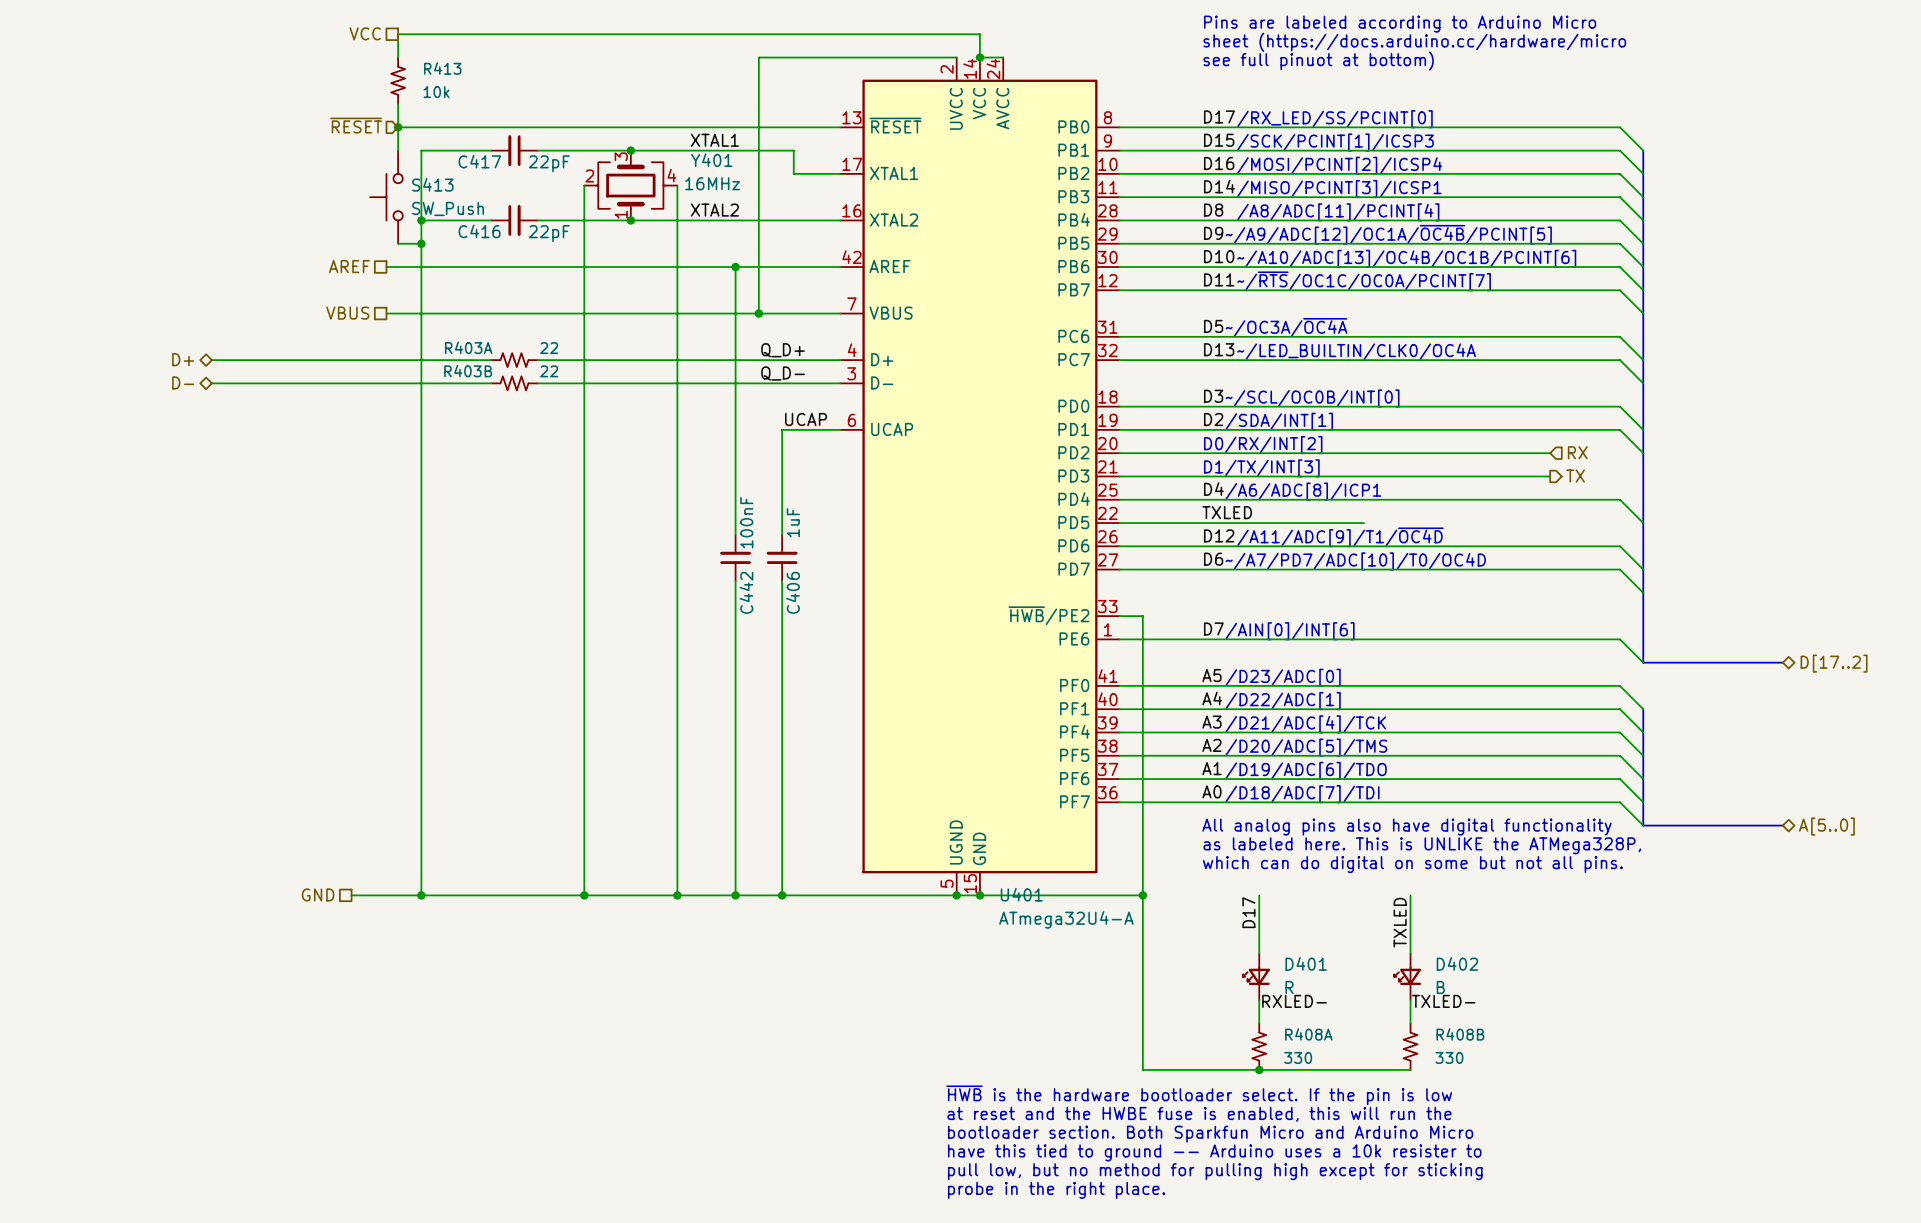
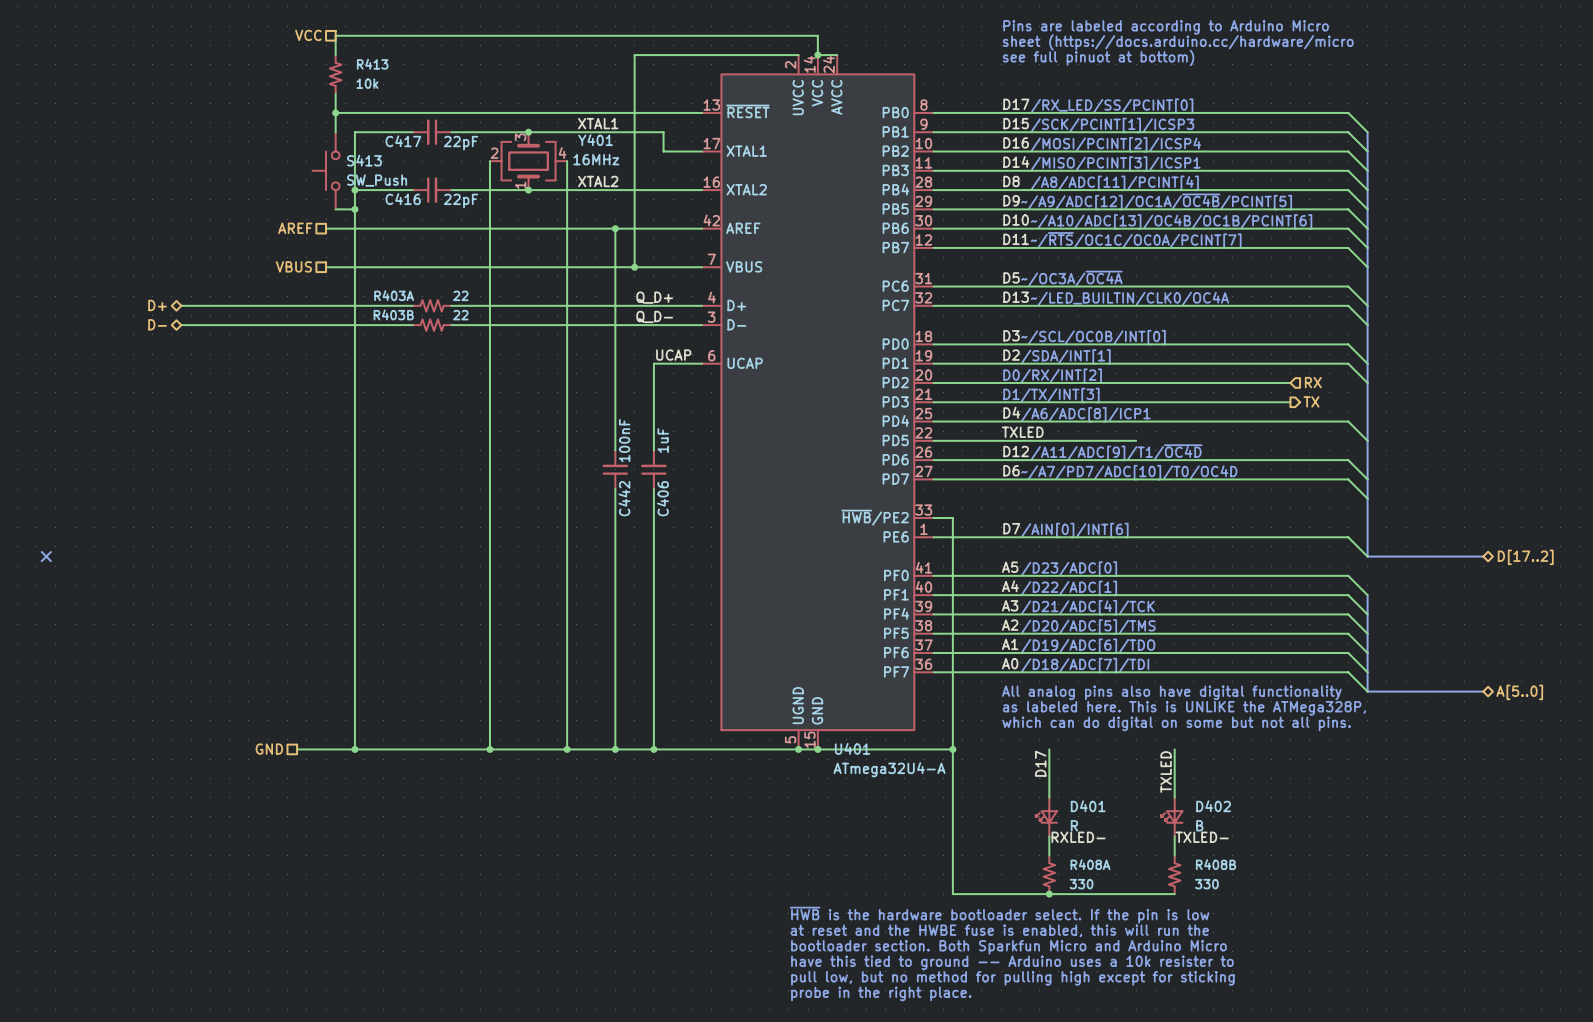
hierarchical label: ~{RESET} (356, 125) -> none
no-connect mark: none -> (46, 556)

